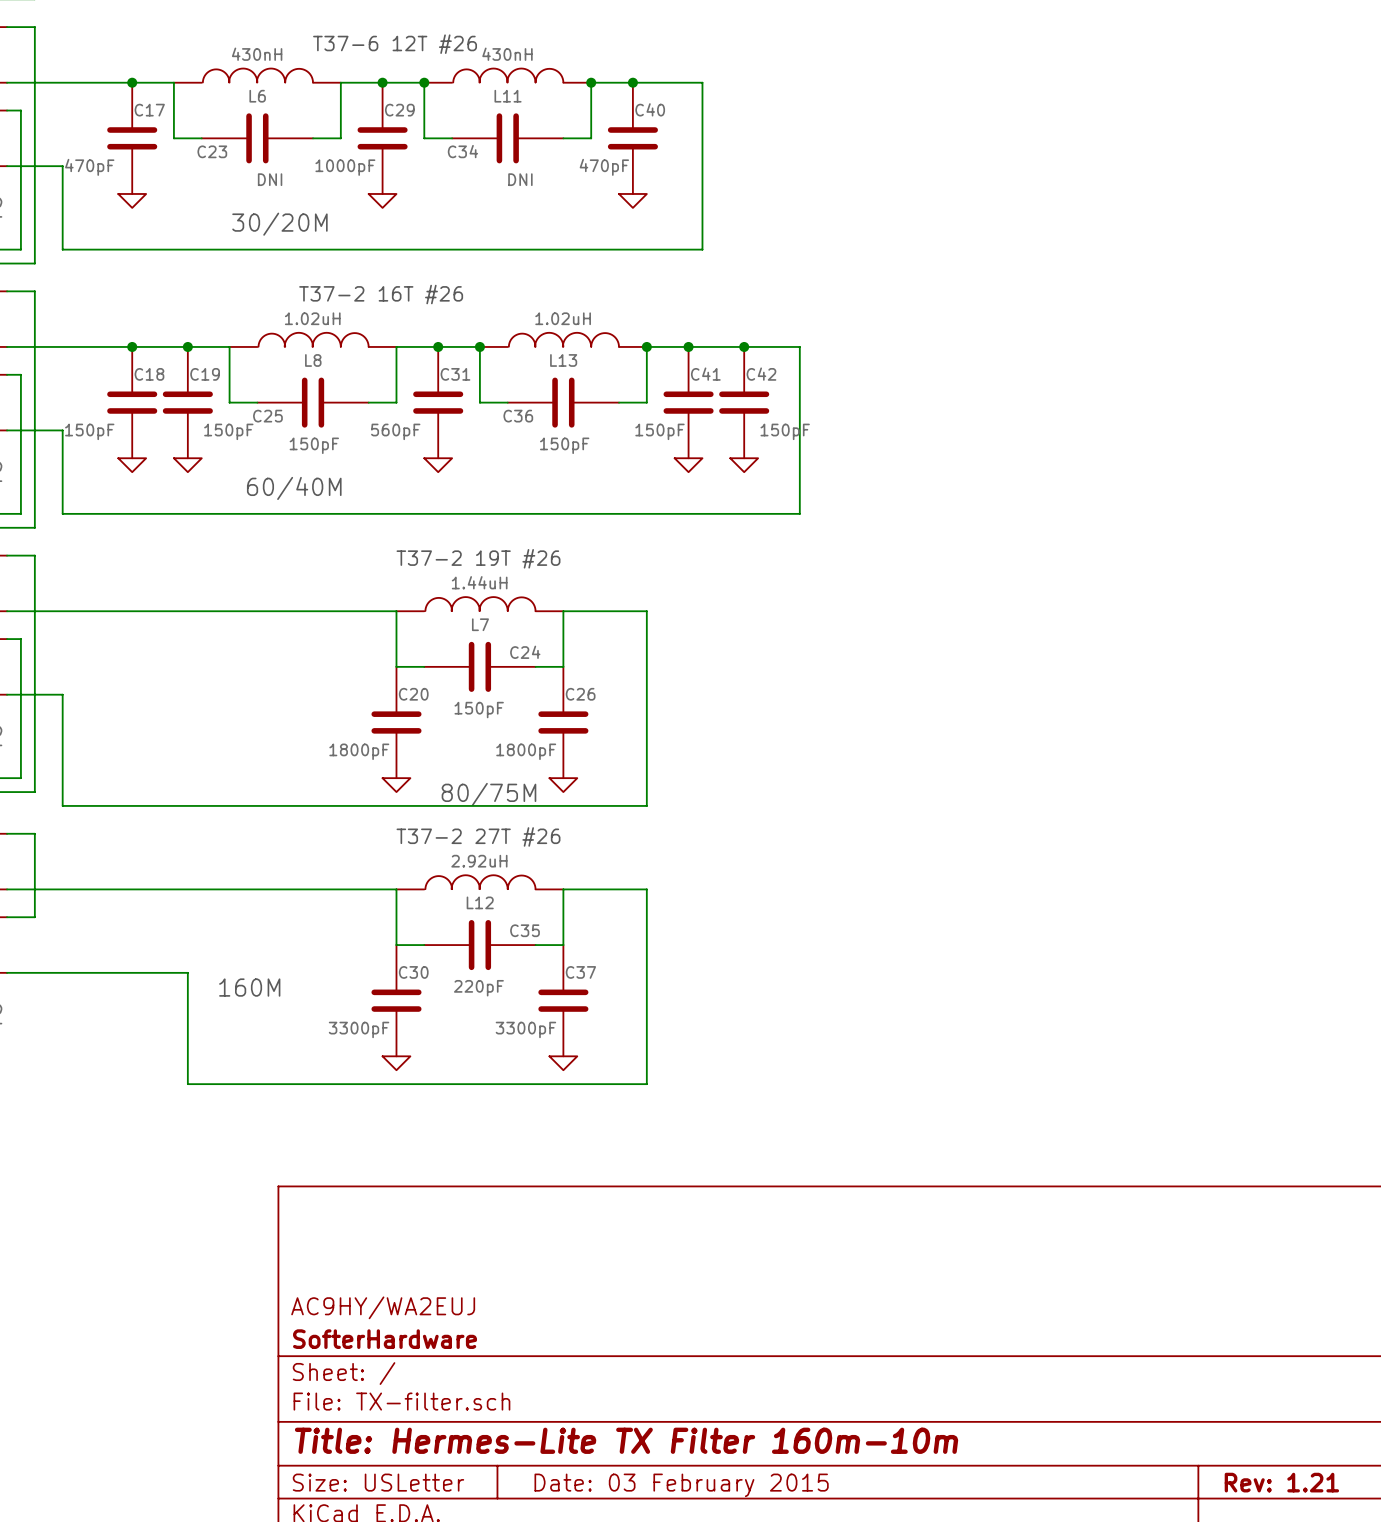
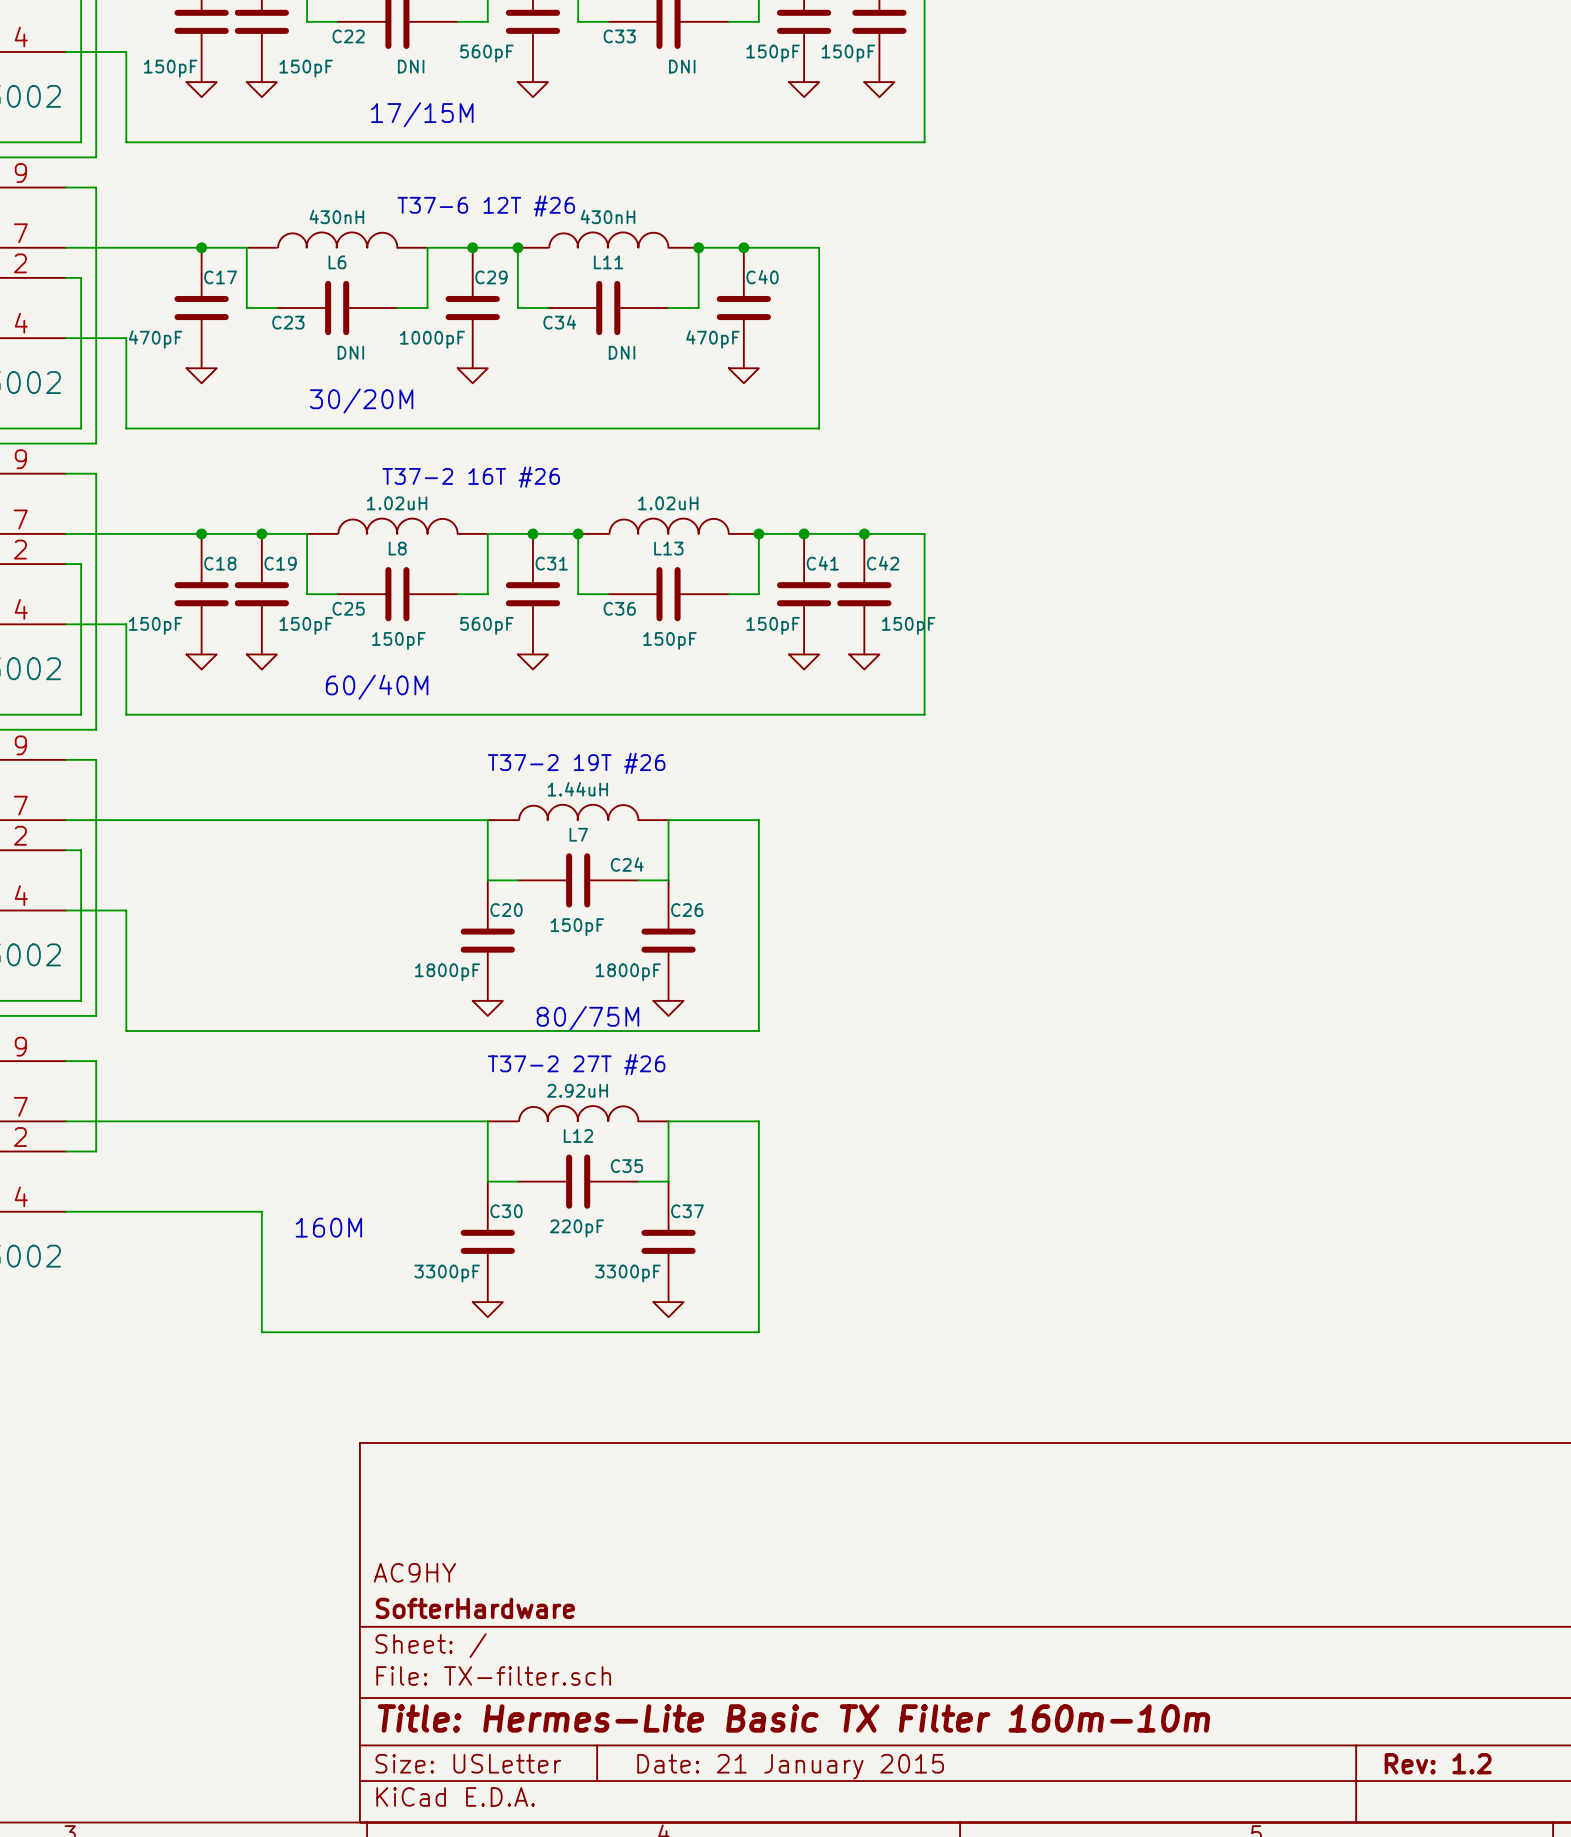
title block: AC9HY/WA2EUJ (383, 1307) -> AC9HY (414, 1572)
title block: Title: Hermes-Lite TX Filter 160m-10m (626, 1440) -> Title: Hermes-Lite Basic TX Filter 160m-10m (793, 1718)
title block: Rev: 1.21 (1281, 1482) -> Rev: 1.2 (1438, 1763)
title block: Date: 03 February 2015 (681, 1485) -> Date: 21 January 2015 (790, 1766)

